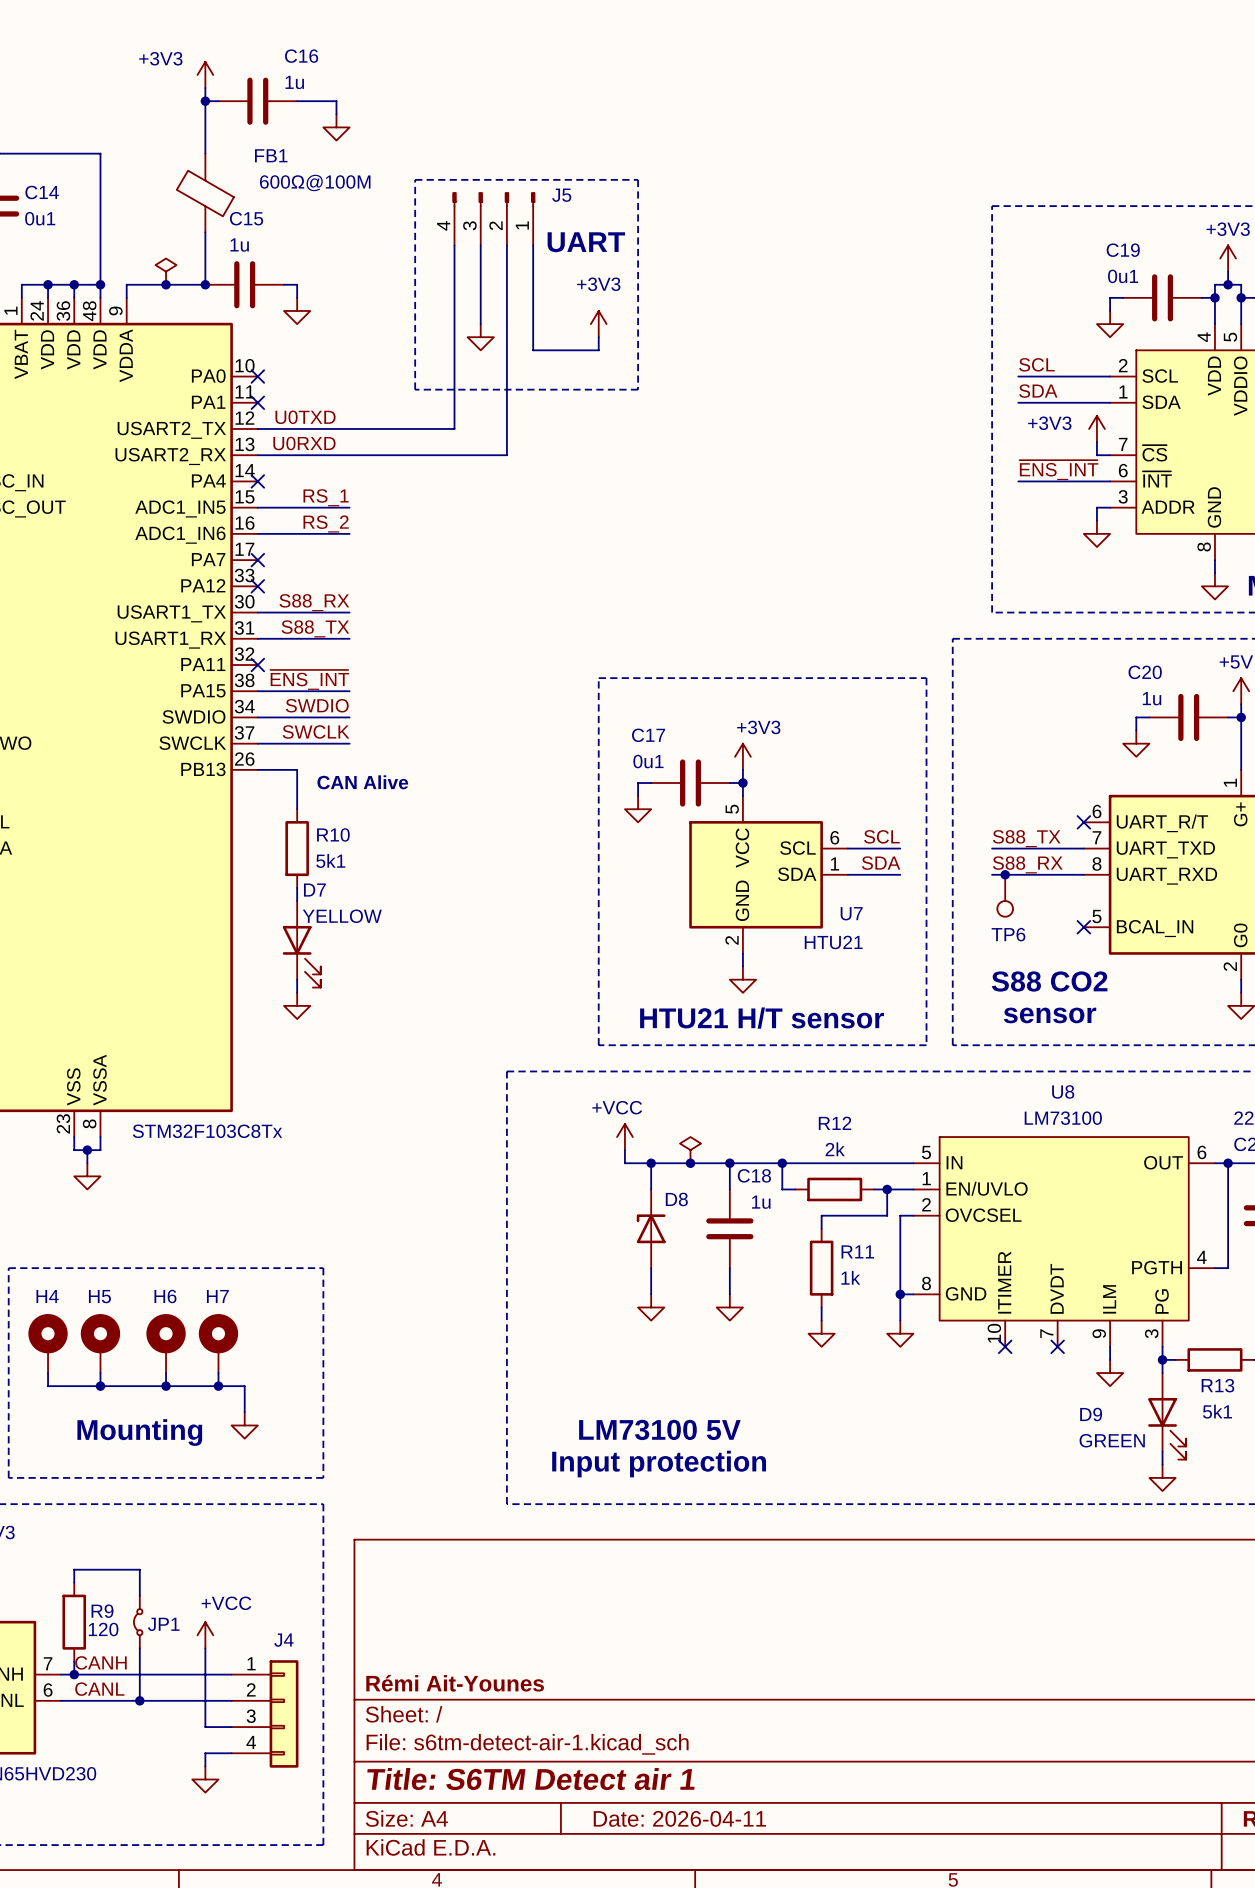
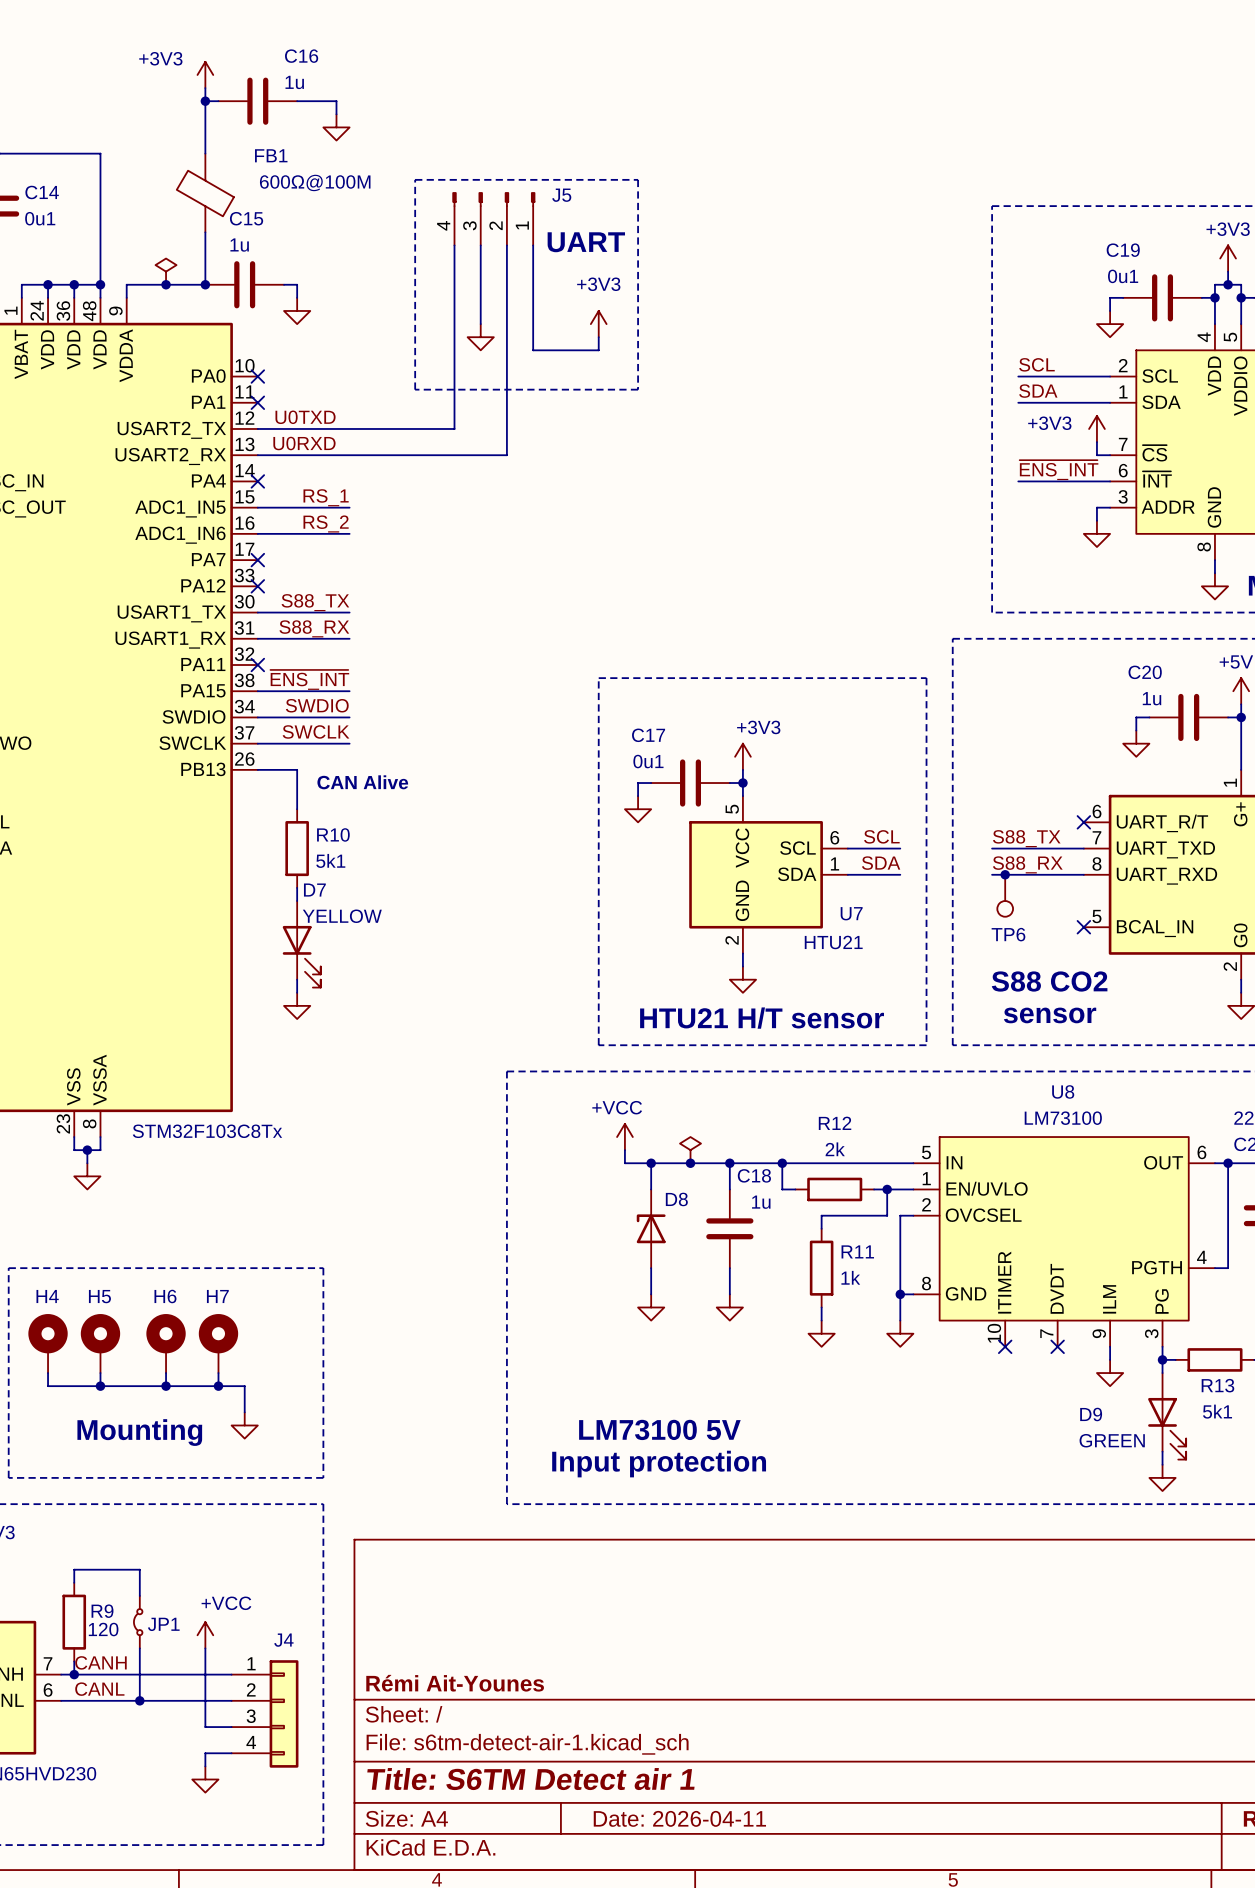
label: S88_RX (314, 602) -> S88_TX (315, 602)
label: S88_TX (315, 628) -> S88_RX (314, 628)

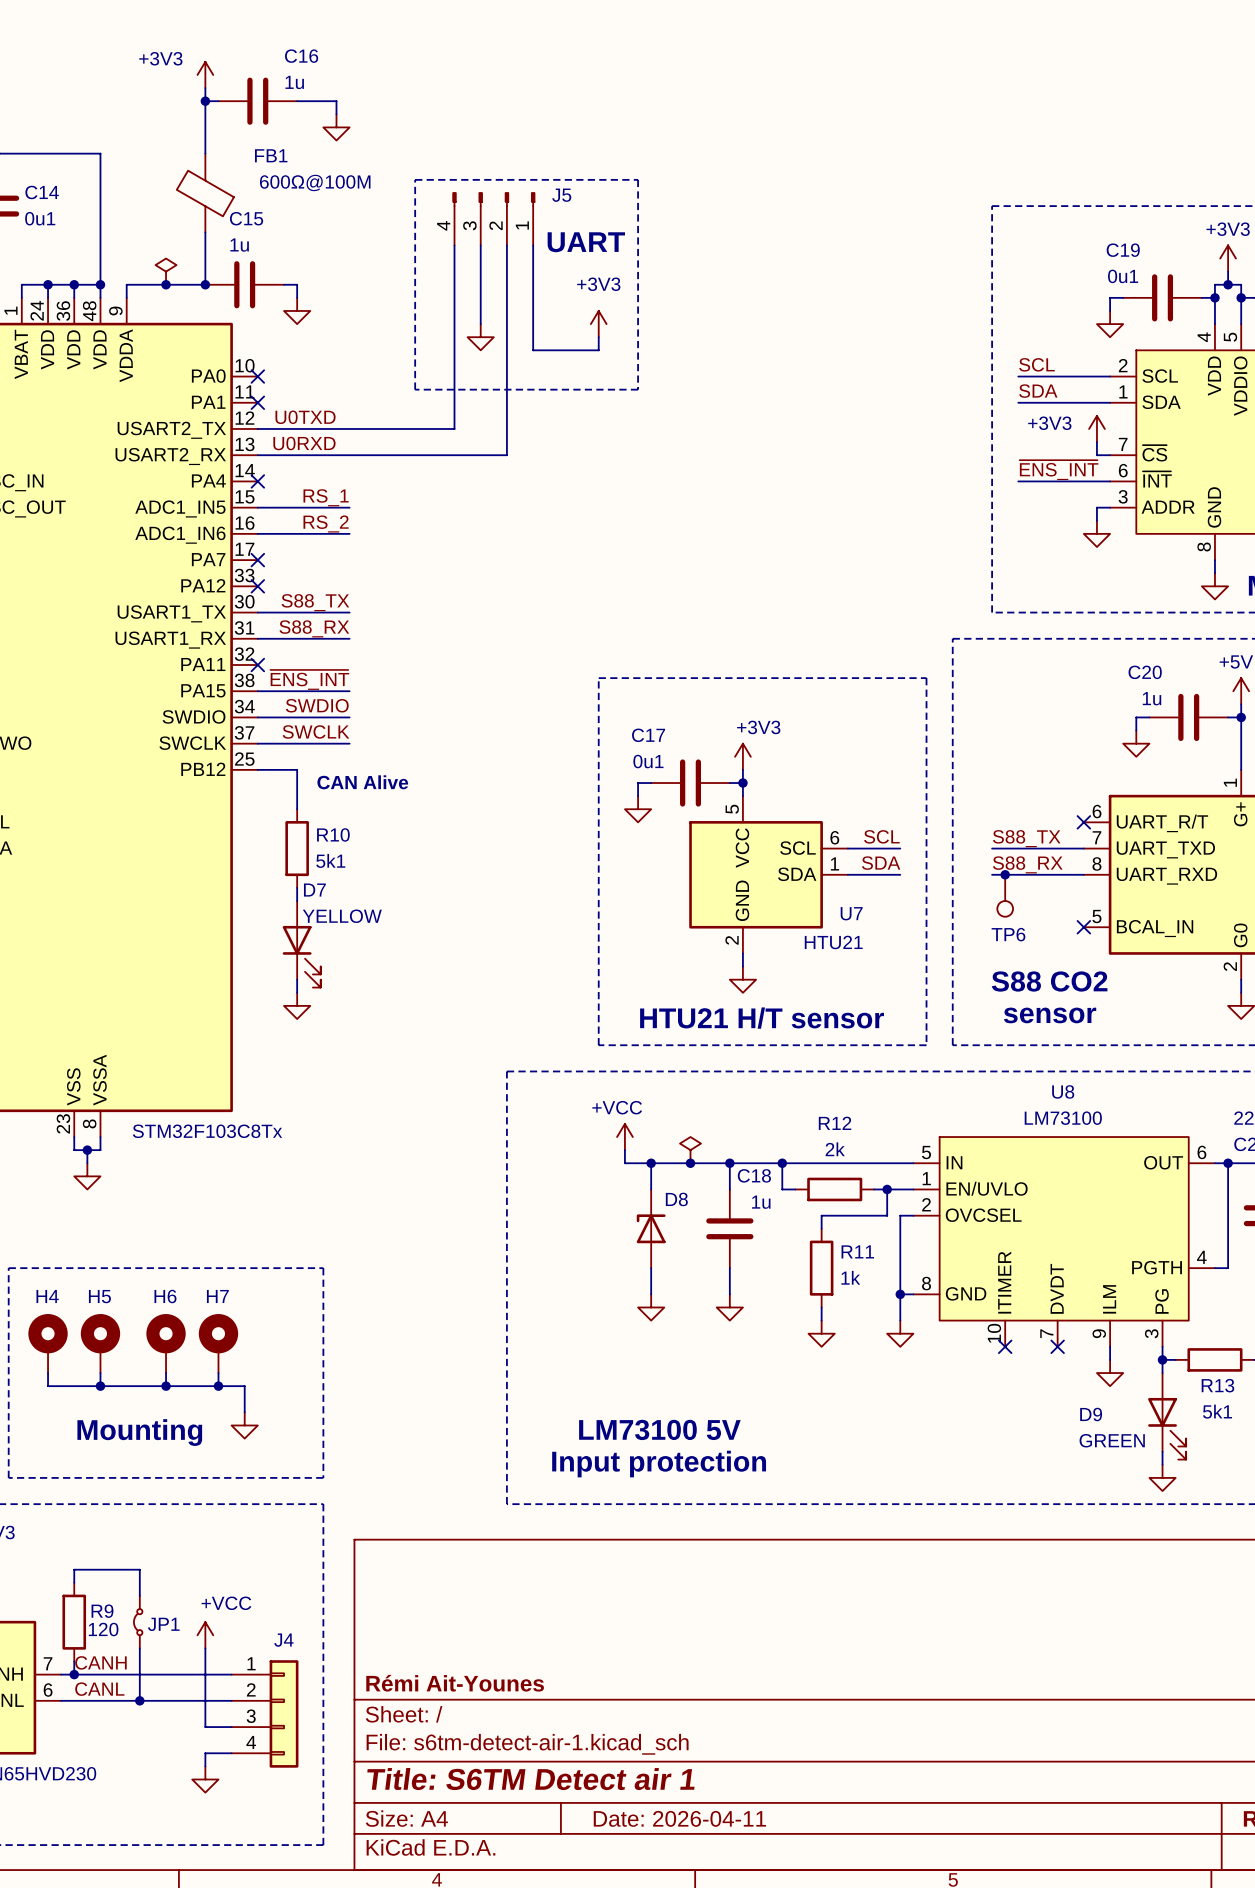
part pin number: 26 (244, 759) -> 25 (244, 759)
part pin name: PB13 (203, 769) -> PB12 (203, 769)

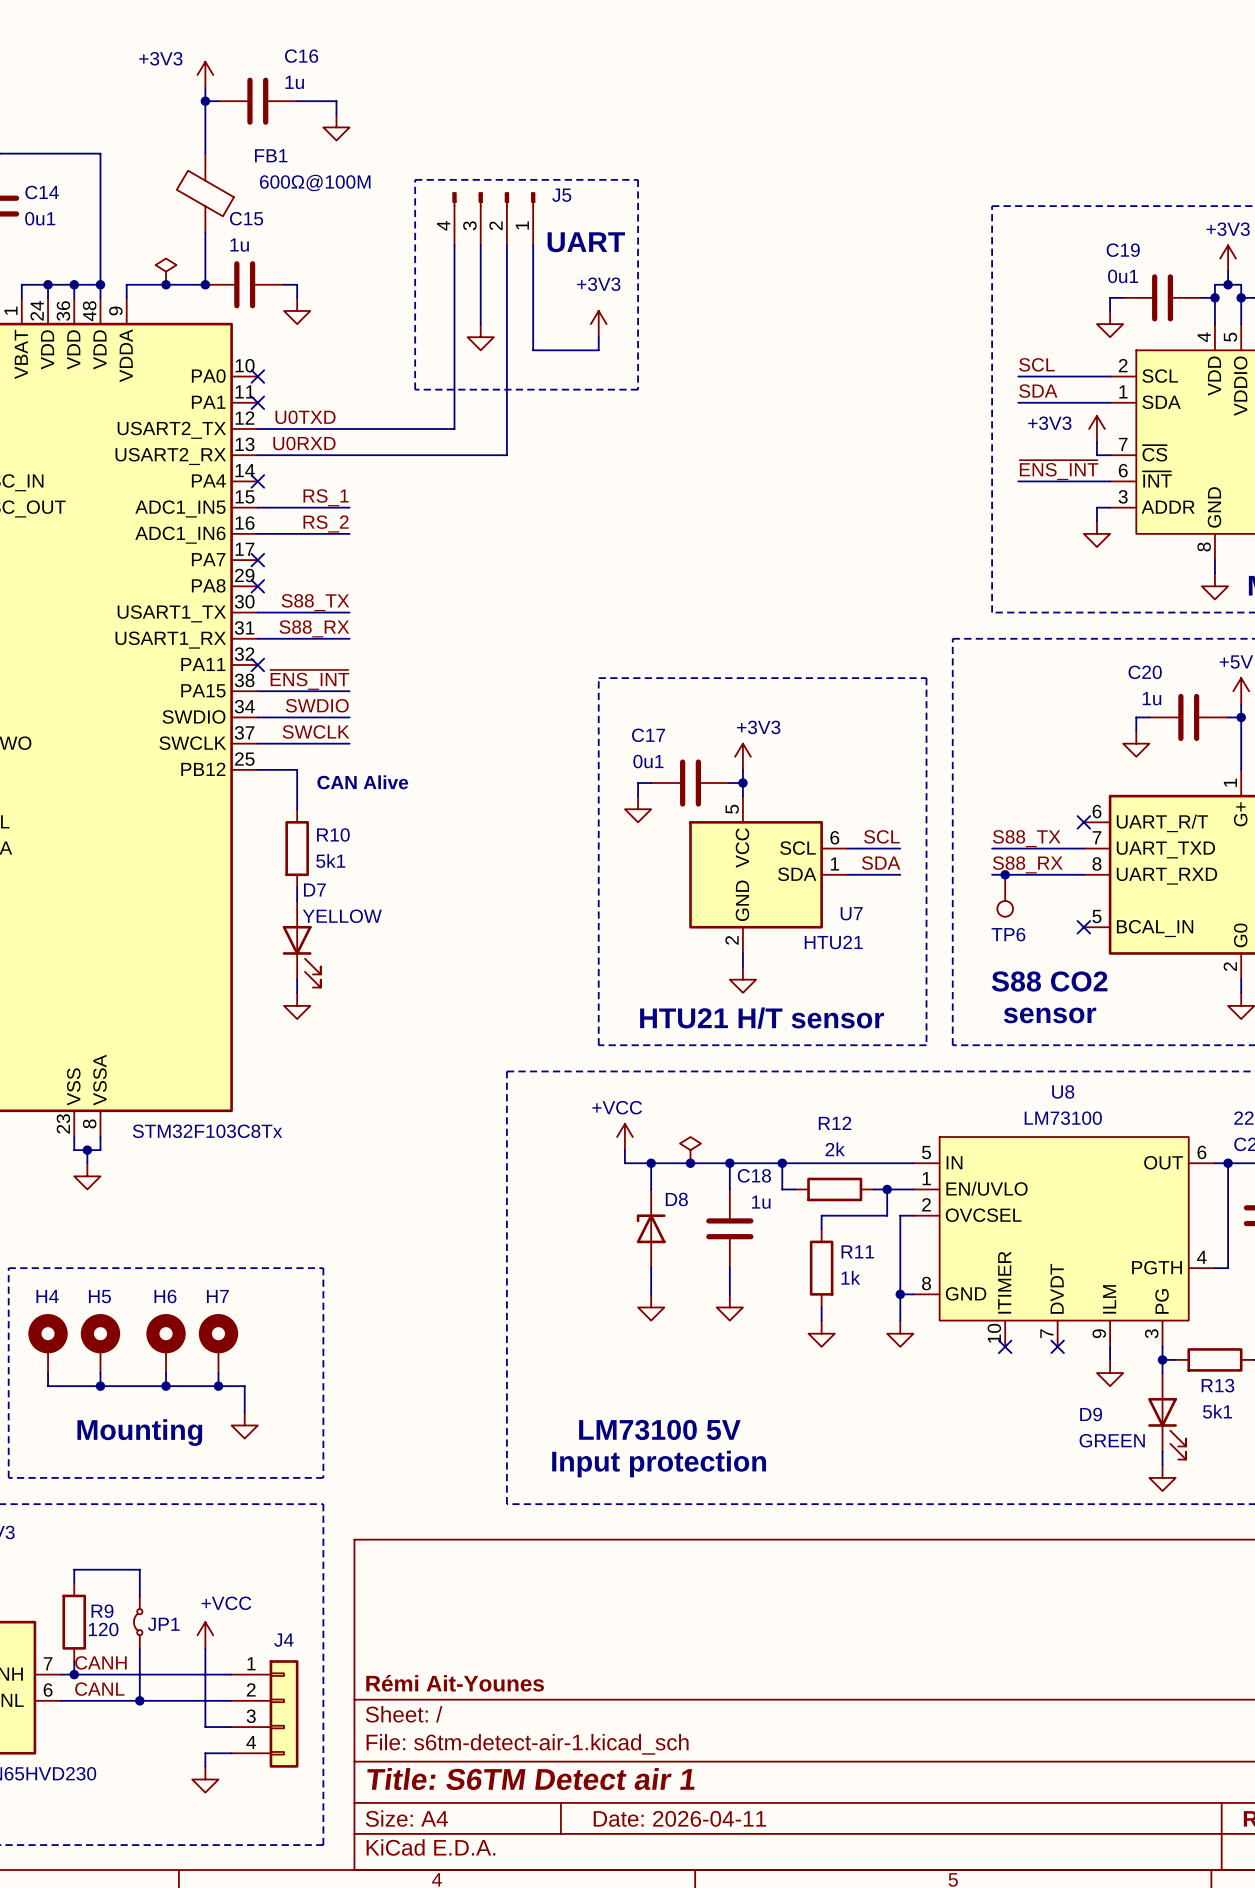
part pin number: 33 (244, 575) -> 29 (244, 575)
part pin name: PA12 (203, 585) -> PA8 (208, 585)

